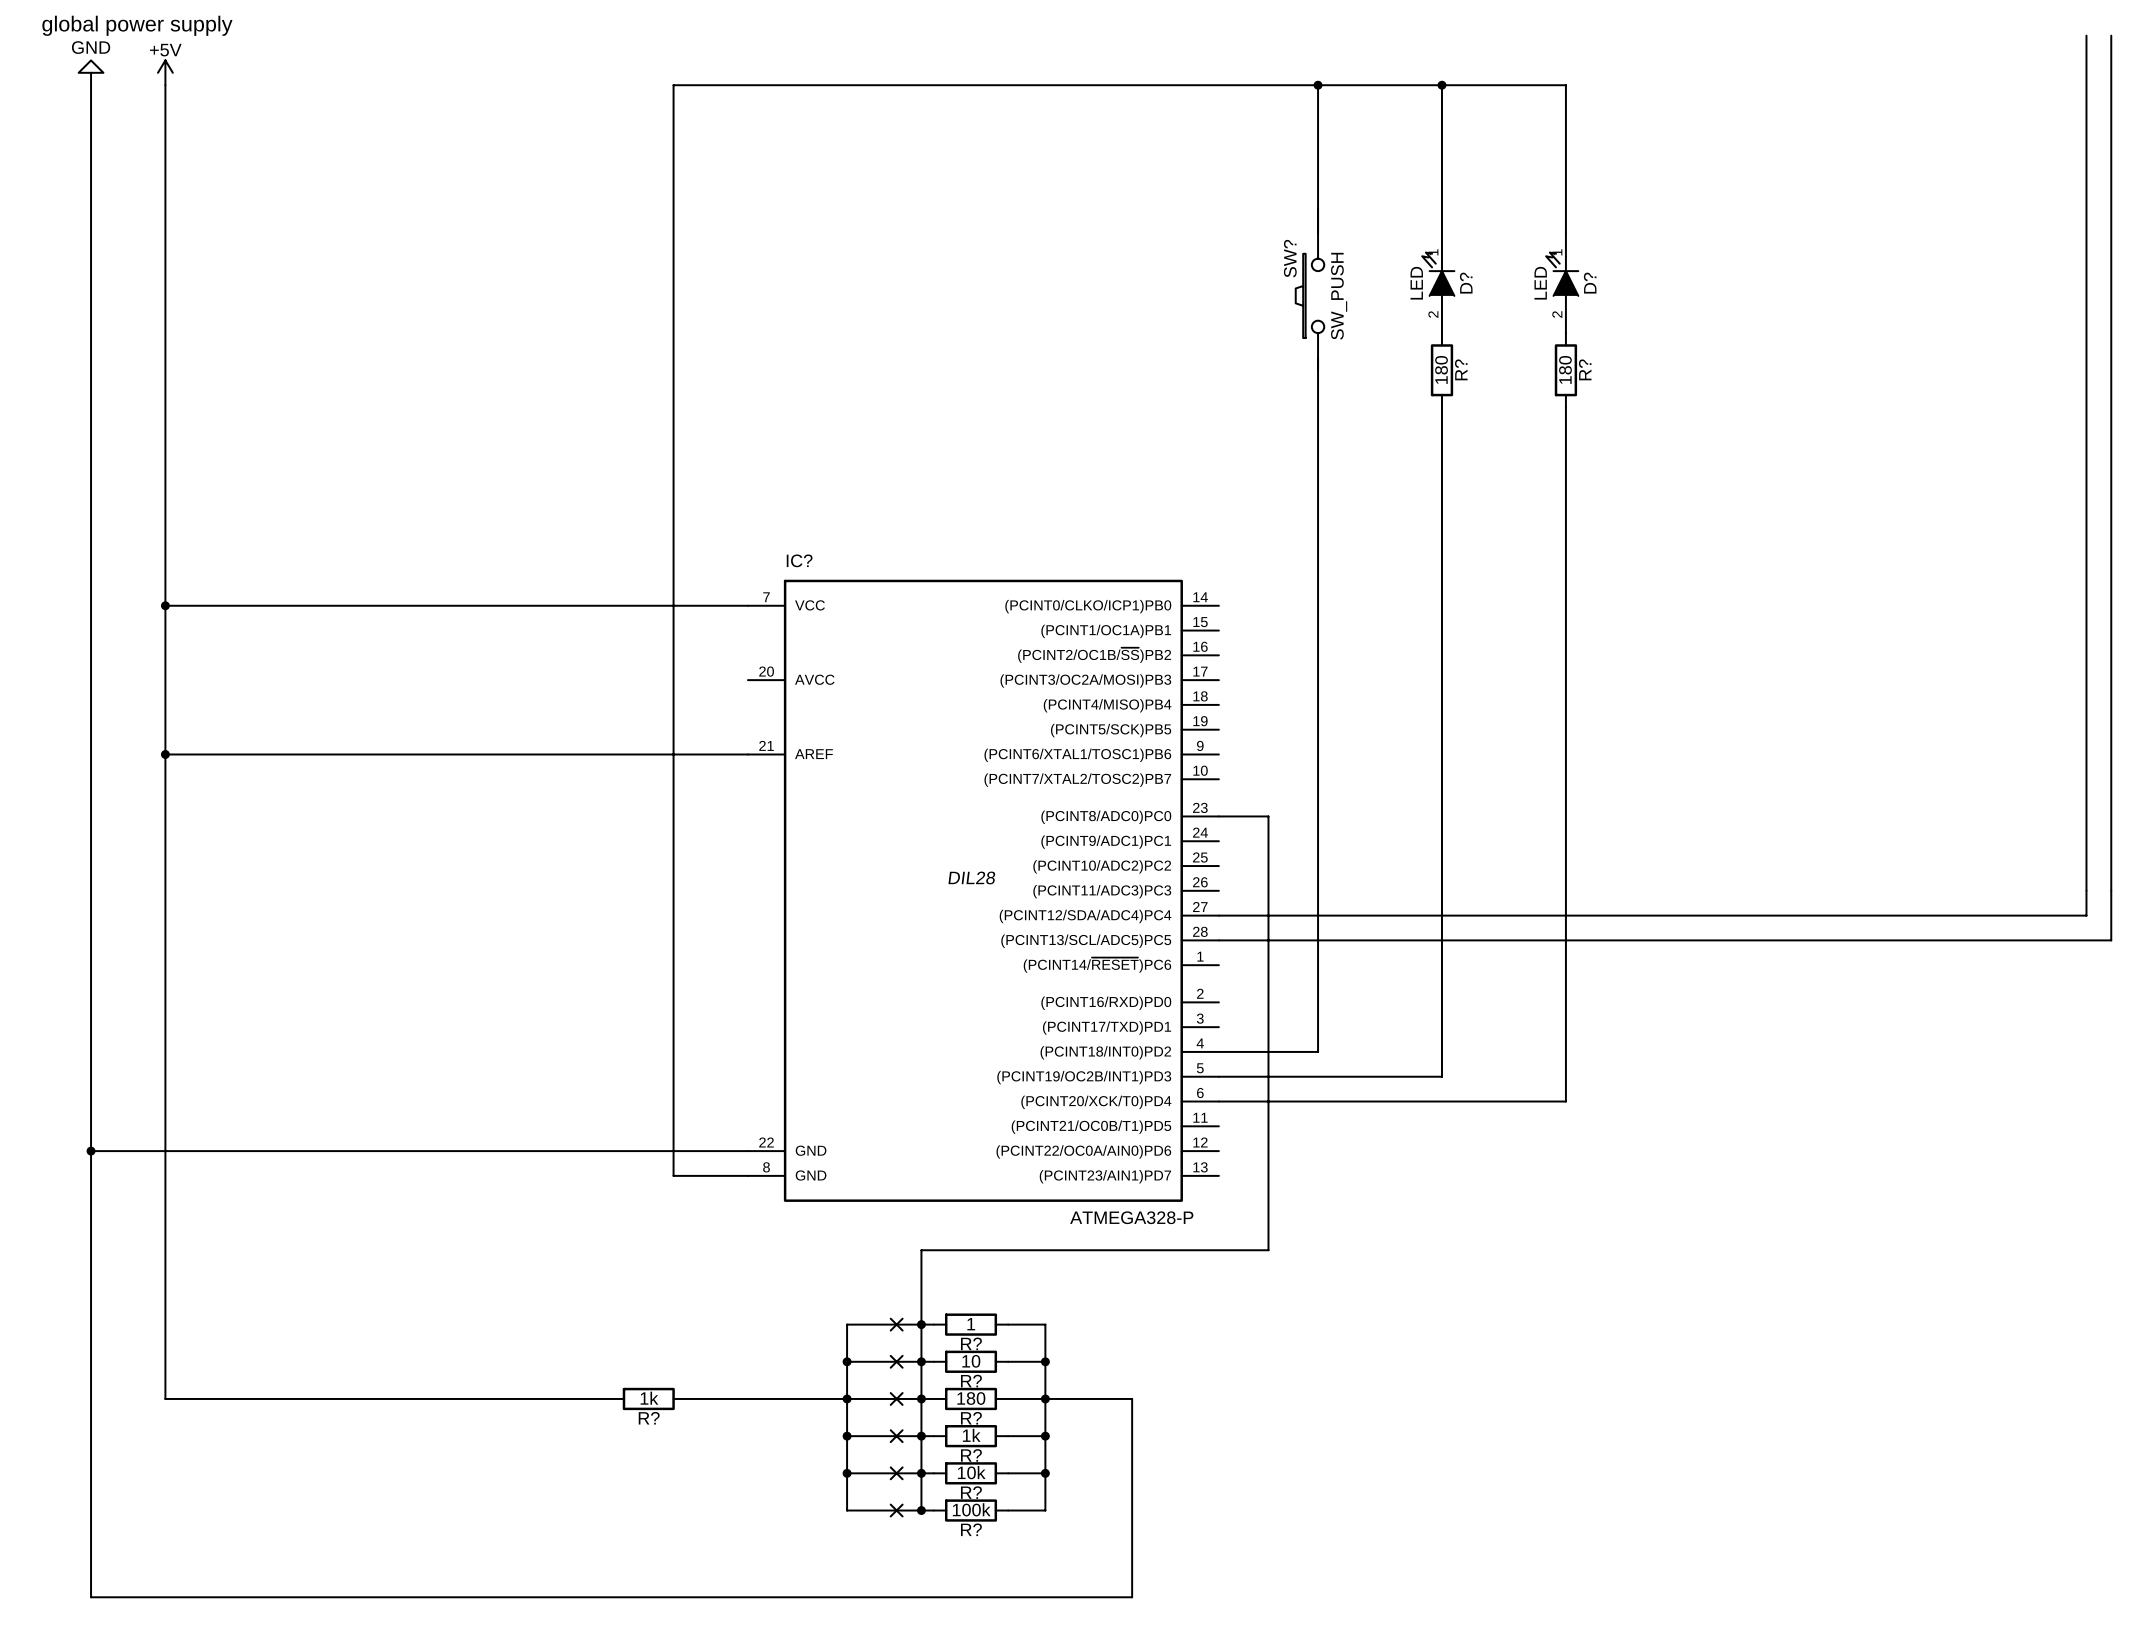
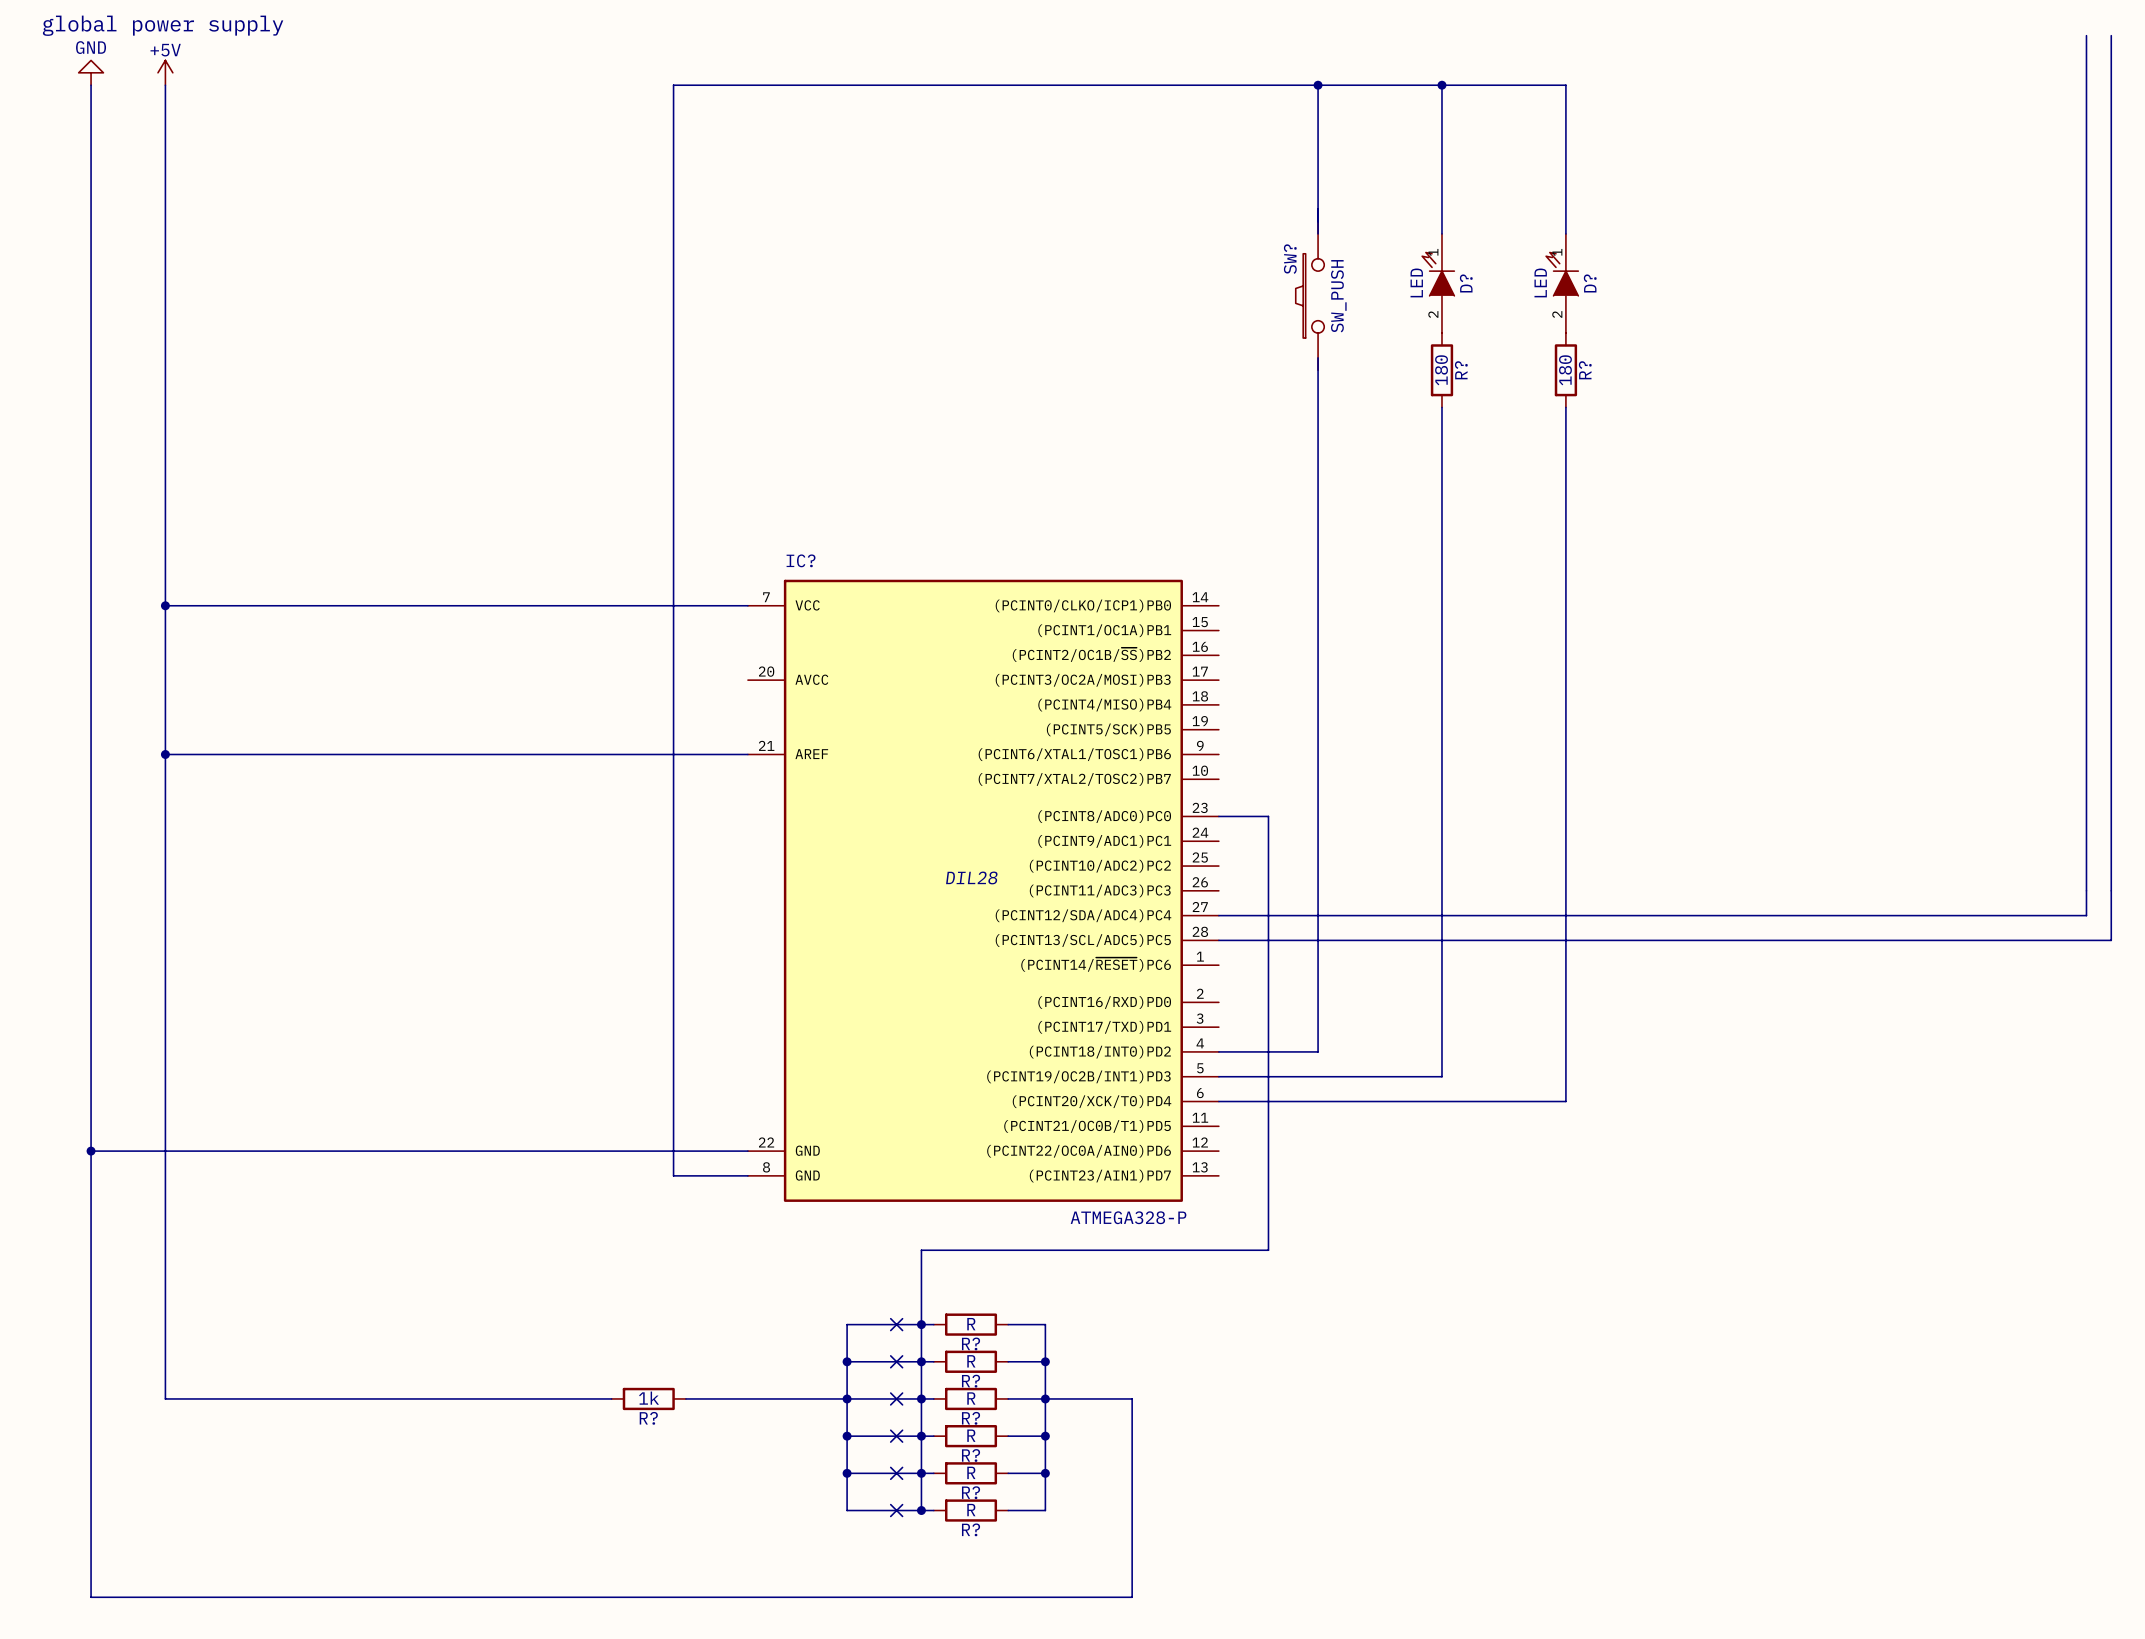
R? value: 1 (971, 1324) -> R (971, 1324)
R? value: 10 (971, 1361) -> R (971, 1361)
R? value: 180 (971, 1398) -> R (971, 1398)
R? value: 1k (971, 1435) -> R (971, 1435)
R? value: 10k (971, 1472) -> R (971, 1472)
R? value: 100k (971, 1509) -> R (971, 1510)

